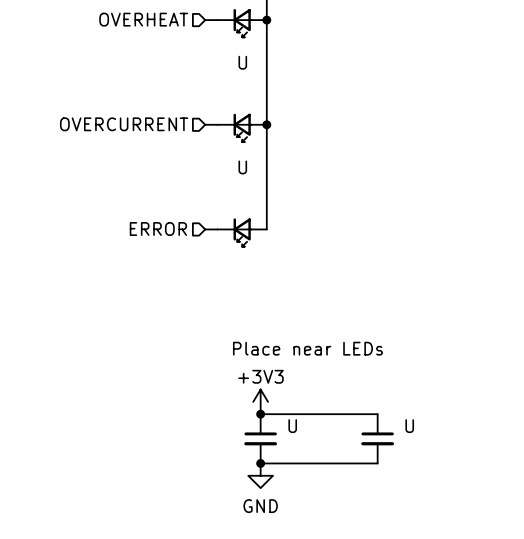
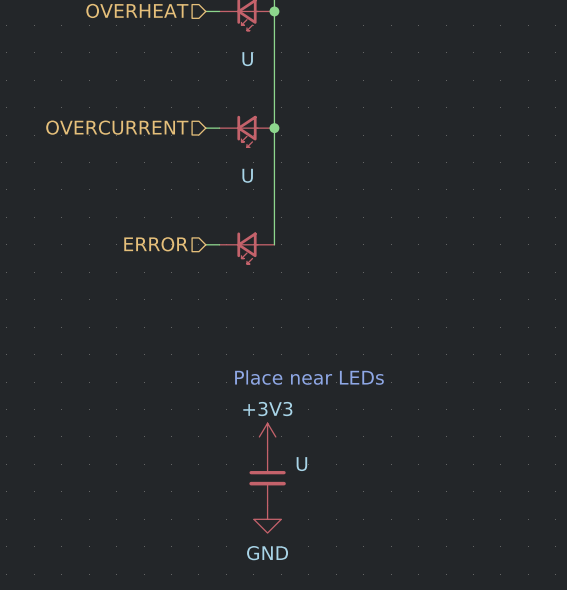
wire: (260, 414) (377, 414) -> none
junction: (260, 414) -> none
U: (377, 438) -> none
wire: (260, 463) (377, 463) -> none
junction: (260, 463) -> none

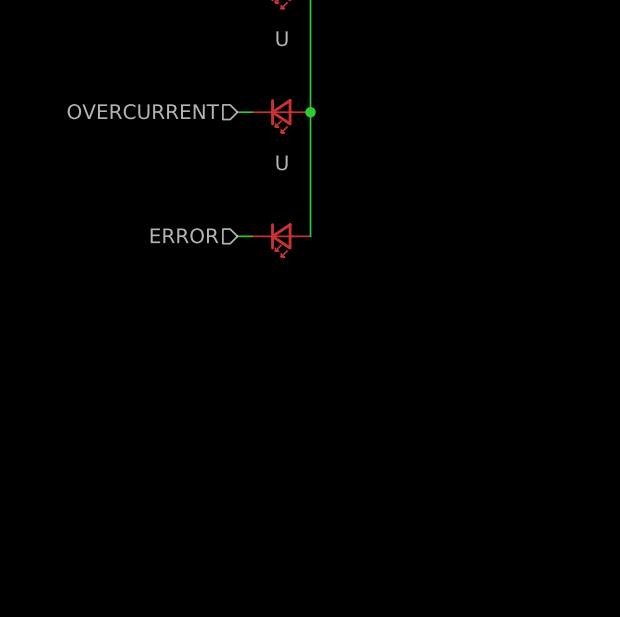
text: Place near LEDs (309, 377) -> none
power symbol: +3V3 (267, 436) -> none
U: (267, 478) -> none
power symbol: GND (267, 519) -> none

